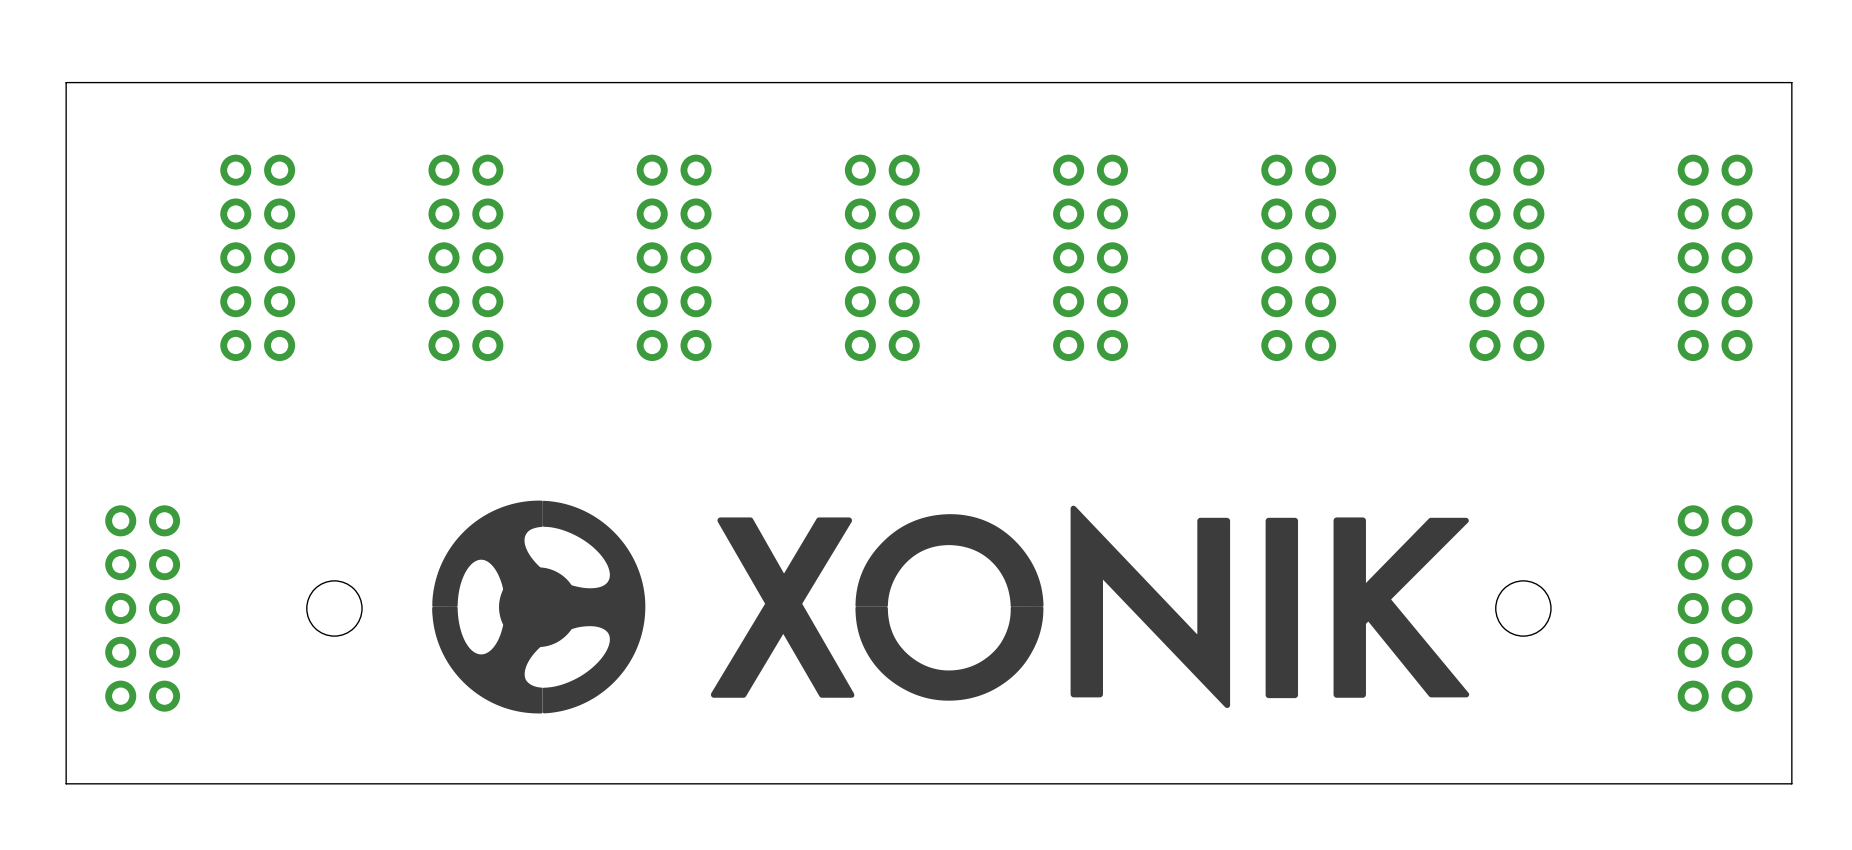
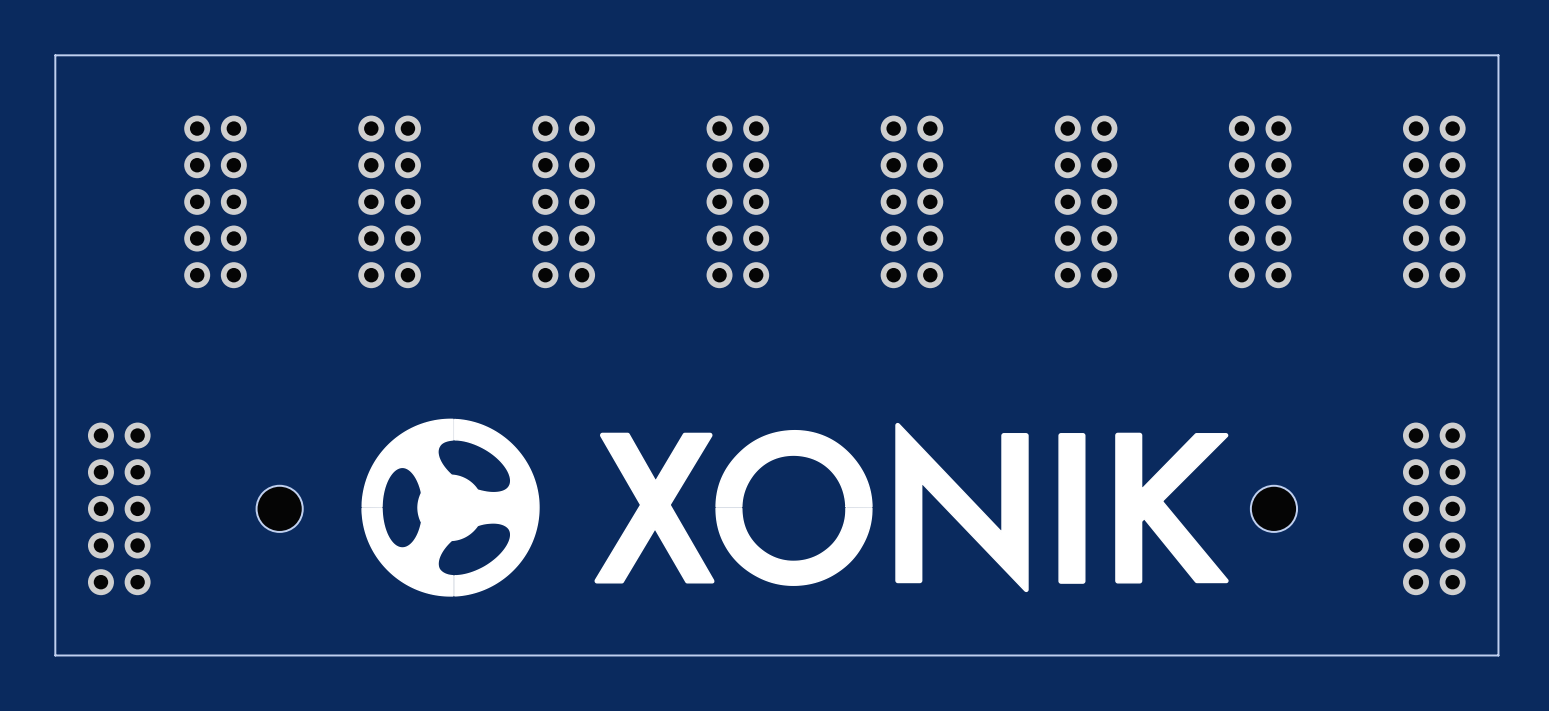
board edge: (1791, 82) (66, 82) -> (1498, 69) (1498, 55) (55, 55) (55, 69)
part position: (257, 257) -> (215, 201)
part position: (465, 257) -> (389, 201)
part position: (674, 257) -> (563, 201)
part position: (882, 257) -> (737, 201)
part position: (1090, 257) -> (911, 201)
part position: (1298, 257) -> (1086, 201)
part position: (1506, 257) -> (1260, 201)
part position: (1715, 257) -> (1434, 201)

